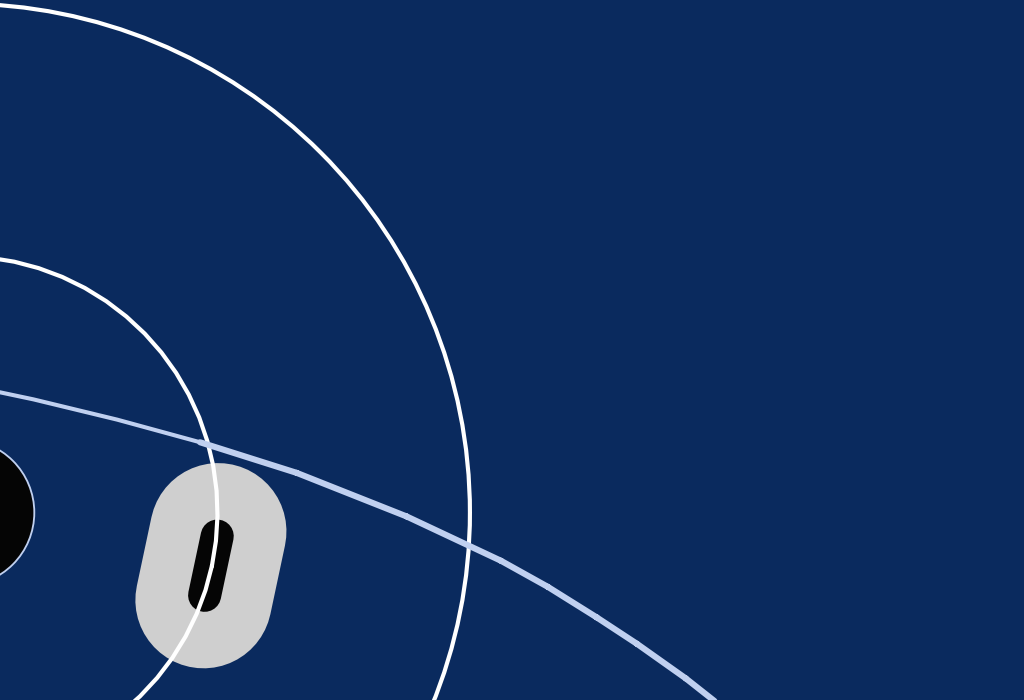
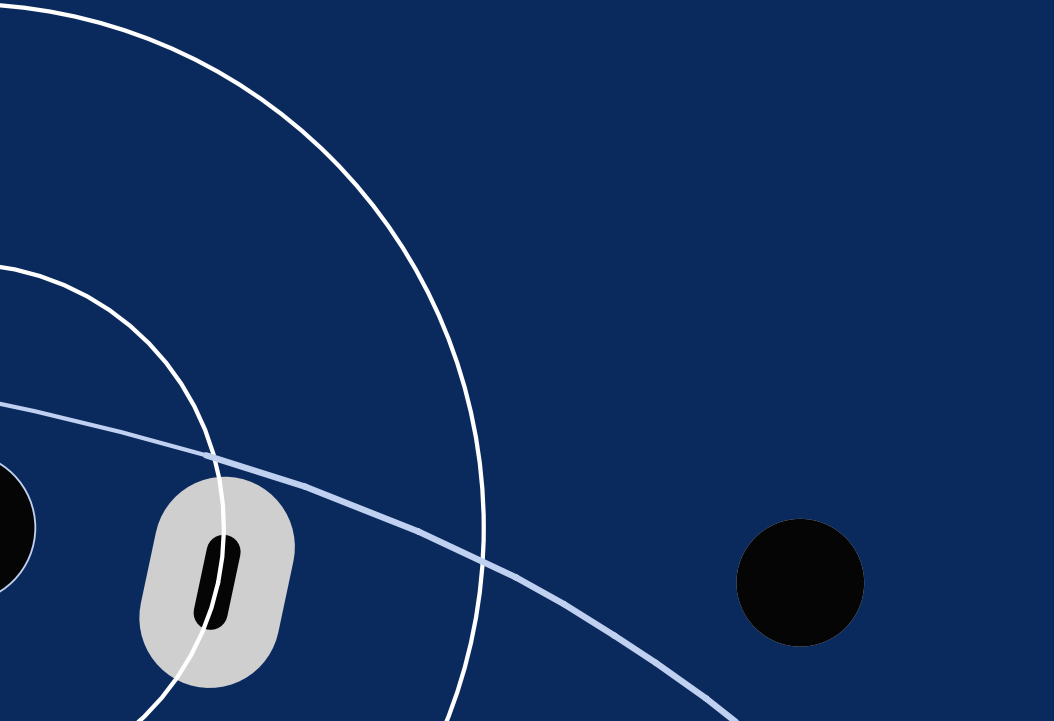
part: none -> (800, 582)

